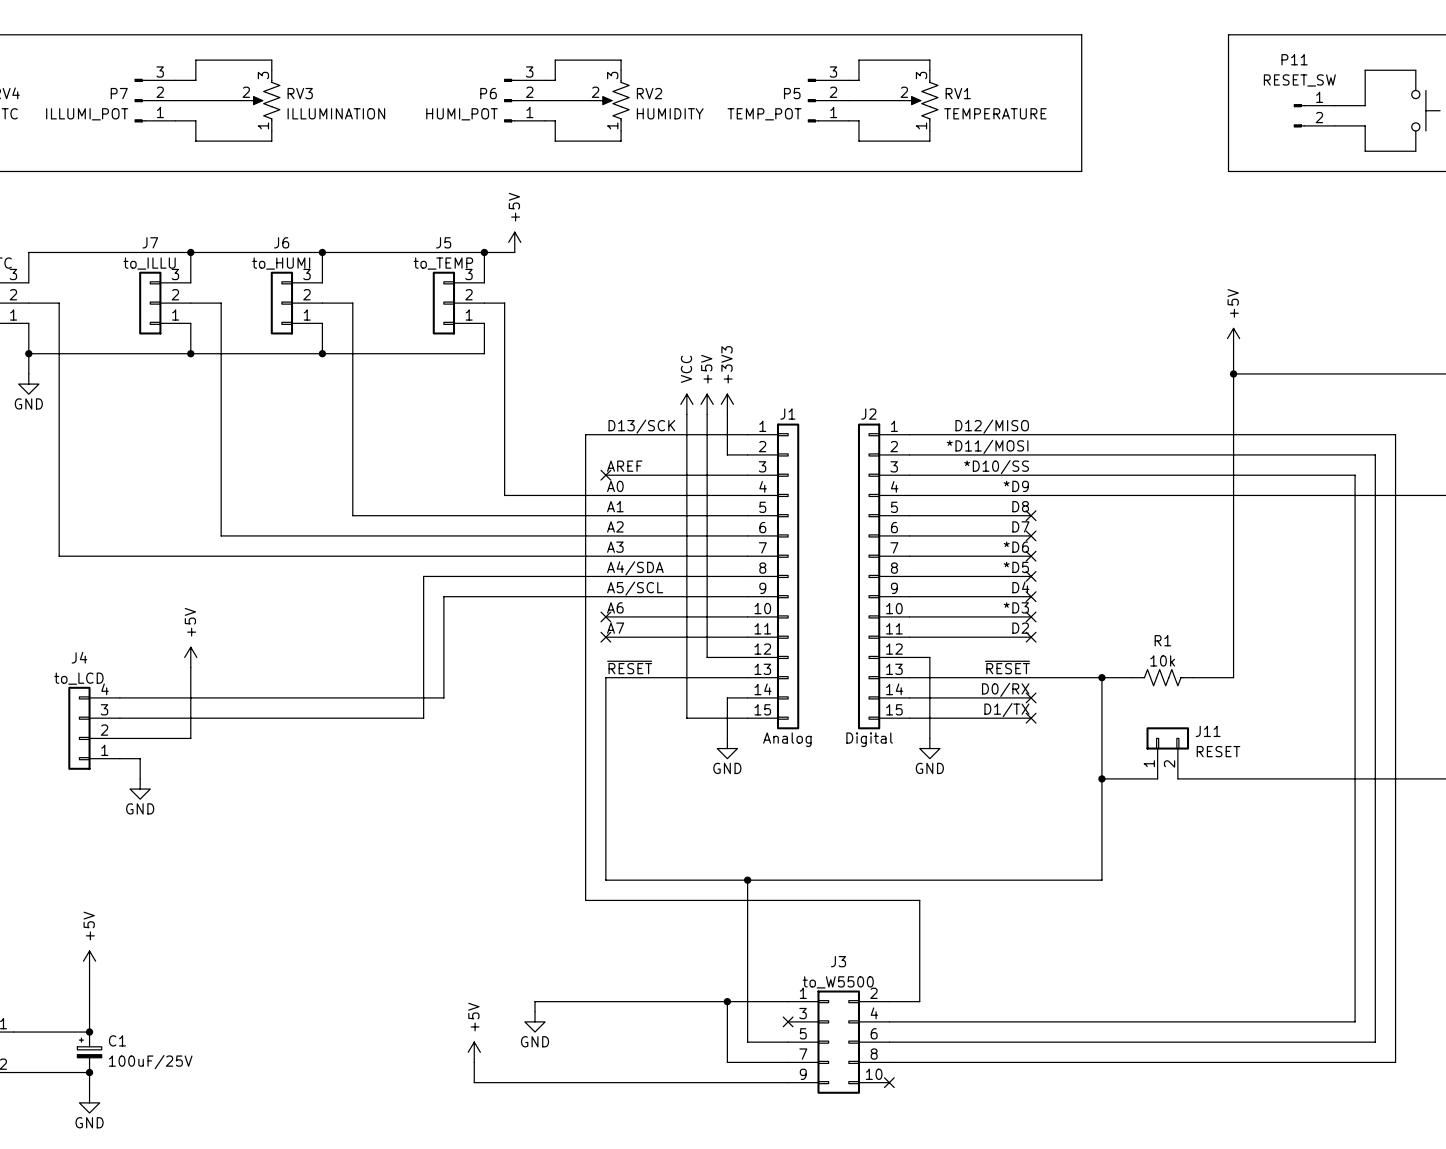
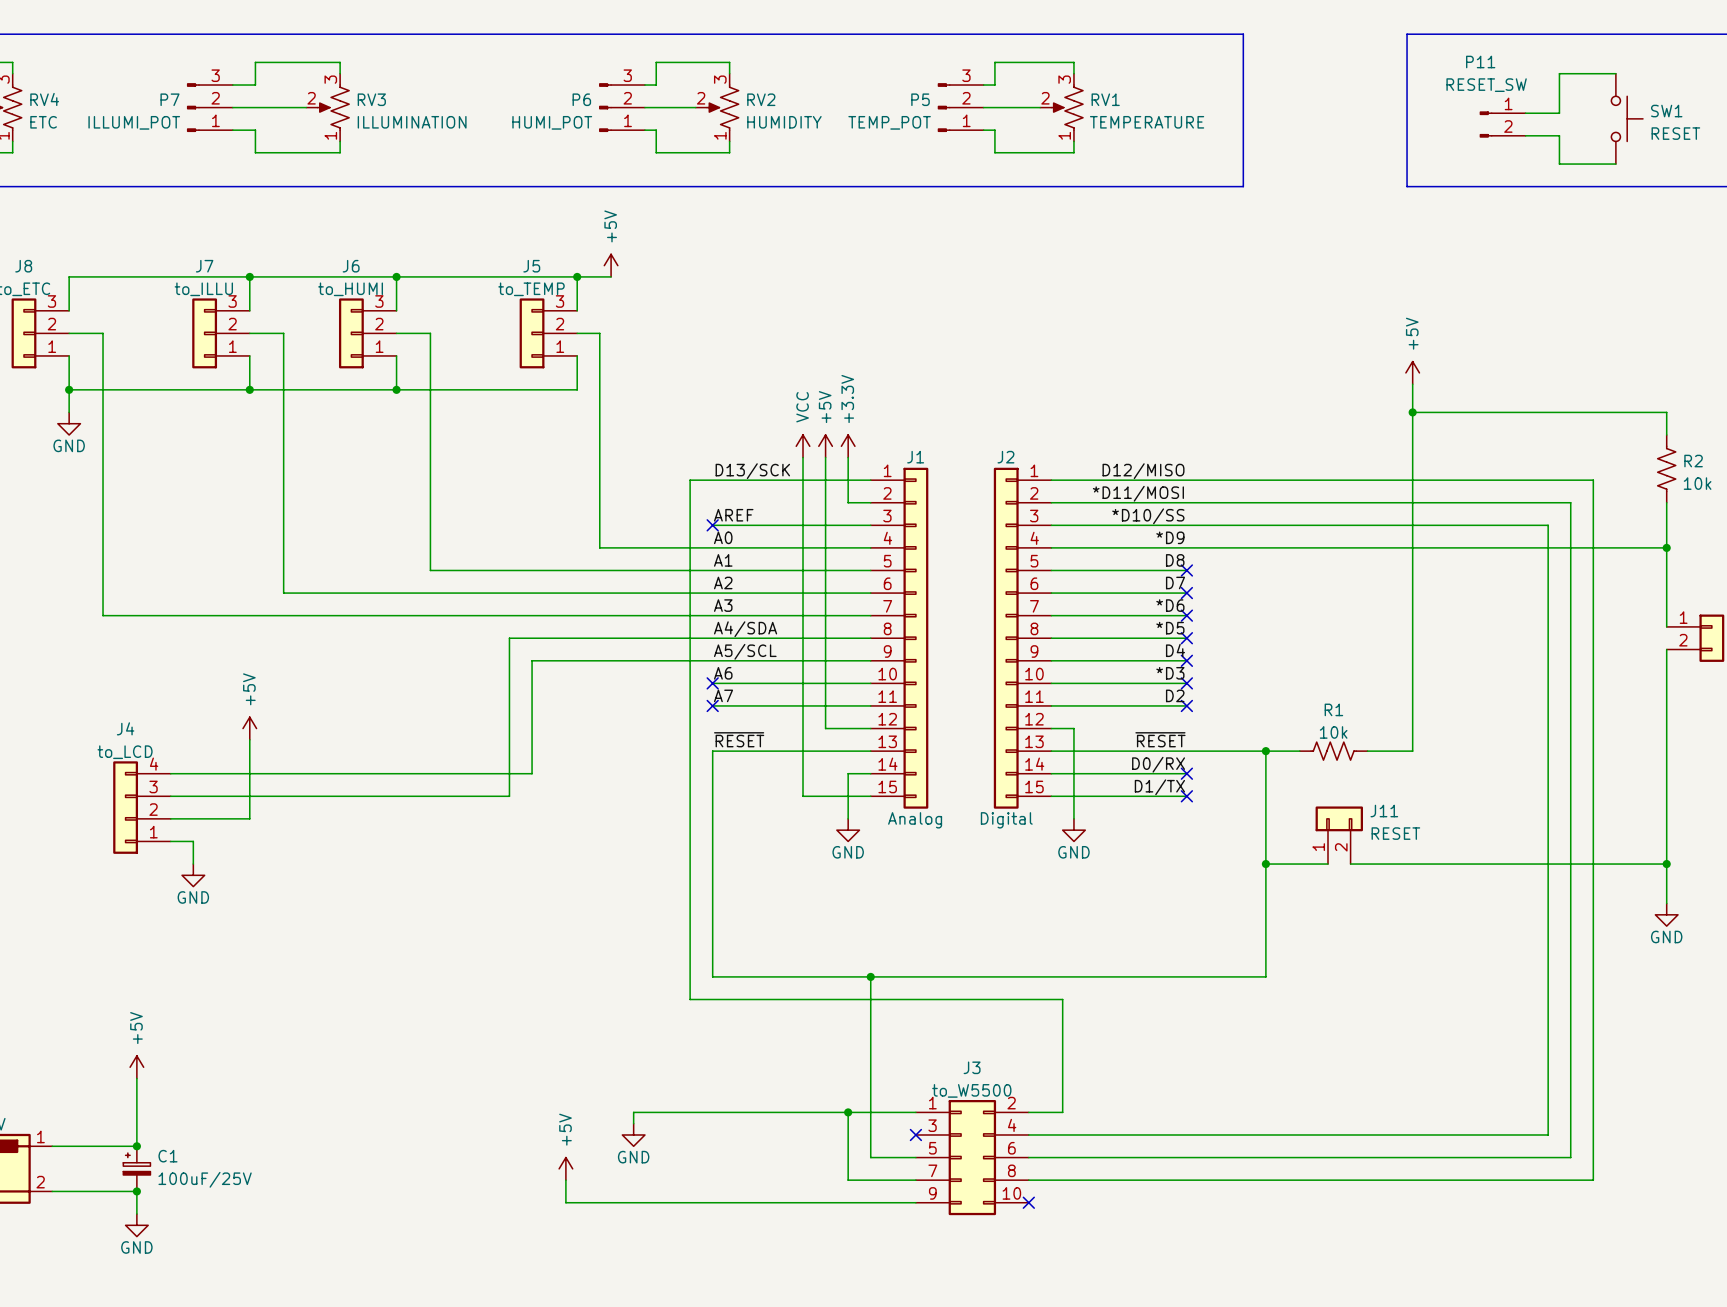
power symbol: +3V3 (727, 404) -> +3.3V (848, 446)

